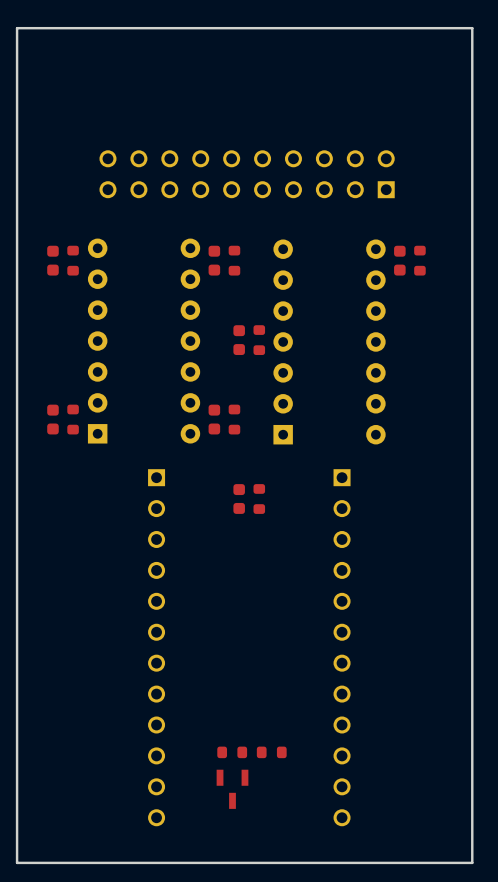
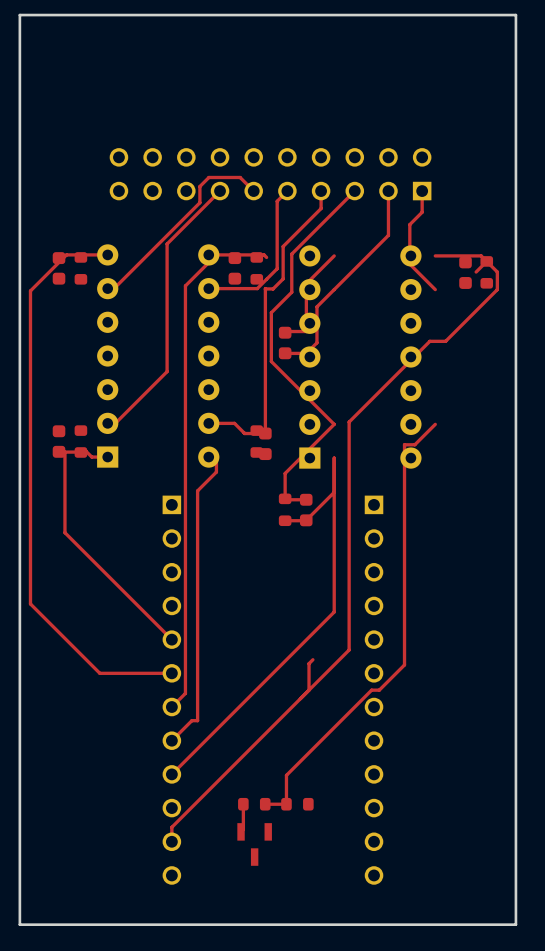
top track: none -> (220, 191) (167, 243) (167, 371) (115, 423)
top track: none -> (253, 191) (240, 177) (208, 177) (199, 186) (199, 202) (115, 288)
top track: none -> (287, 191) (277, 201) (277, 268) (257, 288) (216, 288)
top track: none -> (321, 191) (321, 208) (283, 246) (283, 278) (273, 288) (265, 288) (265, 433) (244, 433) (234, 423) (216, 423)
top track: none -> (354, 191) (291, 254) (291, 292) (271, 312) (271, 361) (334, 424) (285, 473) (285, 498) (306, 499)
top track: none -> (388, 191) (388, 235) (316, 306) (316, 342) (306, 353) (285, 353)
top track: none -> (422, 191) (422, 212) (409, 224) (409, 264) (435, 289)
part footprint: [414, 245, 426, 276] -> [459, 256, 472, 289]
top track: none -> (115, 254) (66, 254) (30, 290) (30, 603) (99, 673) (171, 673)
top track: none -> (334, 255) (306, 283) (306, 331) (285, 332)
top track: none -> (435, 255) (481, 255) (497, 272) (497, 289) (445, 341) (429, 341) (349, 422) (349, 650) (171, 827) (171, 841)
top track: none -> (266, 257) (264, 254) (216, 254) (185, 285) (185, 693) (171, 707)
top track: none -> (486, 261) (476, 272)
part: (399, 260) -> none
part: none -> (486, 272)
part footprint: [253, 325, 266, 356] -> [278, 326, 292, 360]
part: (239, 340) -> none
top track: none -> (435, 424) (414, 444) (404, 444) (404, 664) (379, 690) (371, 690) (286, 775) (286, 804) (265, 804)
part position: (214, 419) -> (265, 443)
top track: none -> (115, 457) (91, 457) (86, 451) (64, 452) (64, 532) (171, 639)
top track: none -> (216, 457) (216, 472) (197, 490) (197, 720) (191, 720) (171, 740)
top track: none -> (334, 458) (334, 612) (171, 774)
top track: none -> (334, 492) (305, 520) (285, 520)
part: none -> (306, 510)
part: (239, 499) -> none
part position: (259, 499) -> (285, 509)
top track: none -> (312, 659) (309, 663) (309, 690)
top track: none -> (243, 804) (243, 829) (241, 831)

